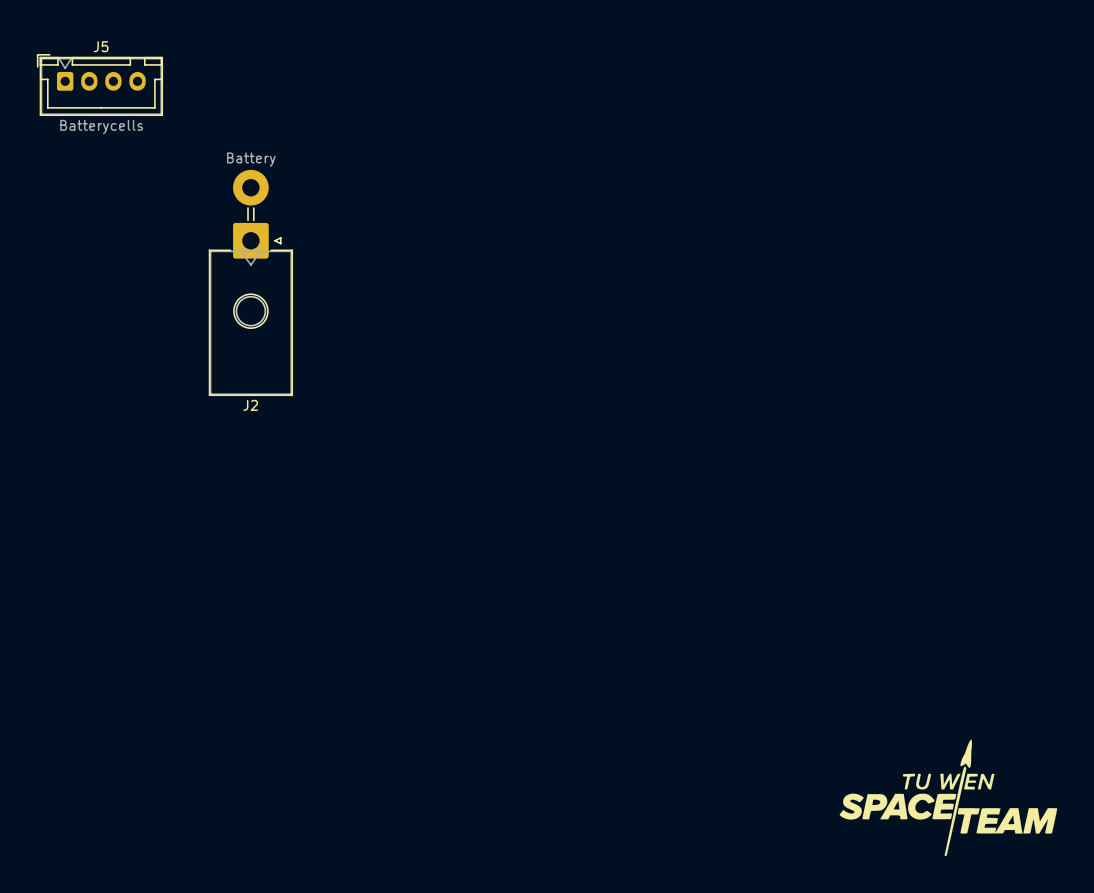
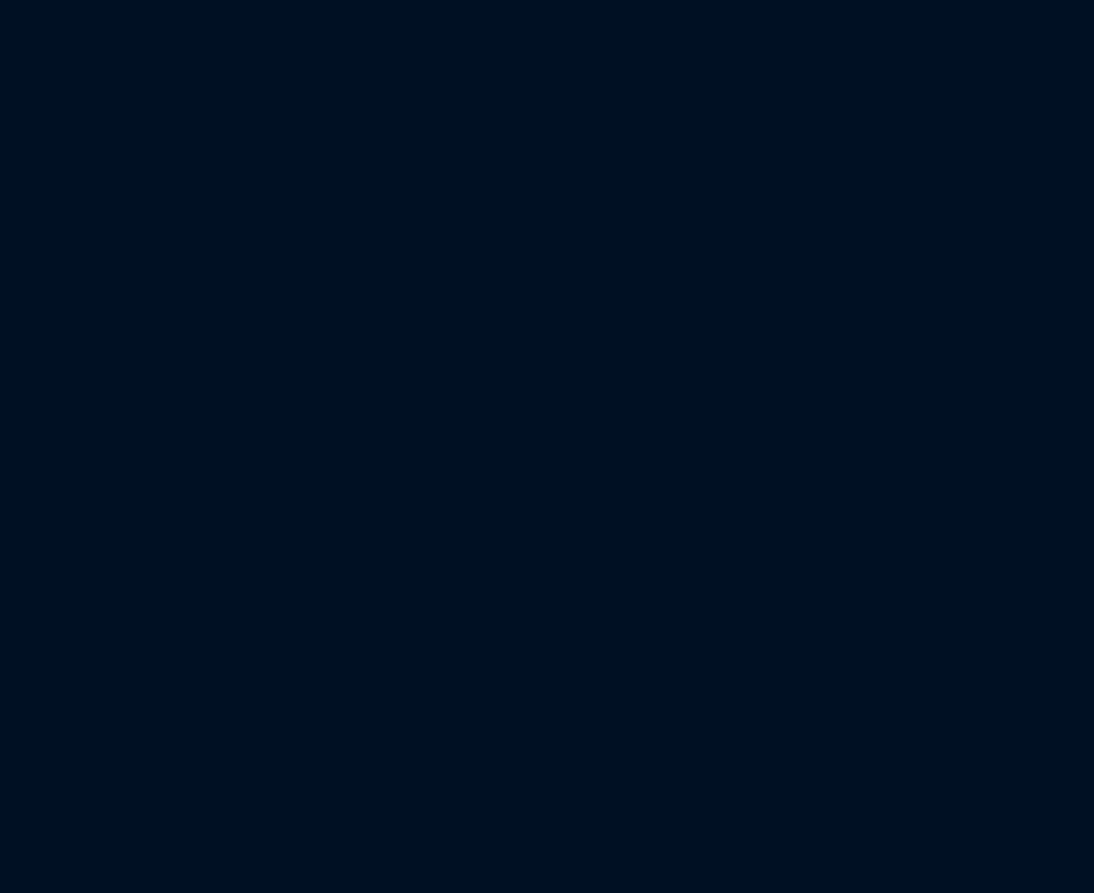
J5: Batterycells (99, 85) -> none
J2: Battery (250, 282) -> none
drawing: [839, 739, 1058, 856] -> none

